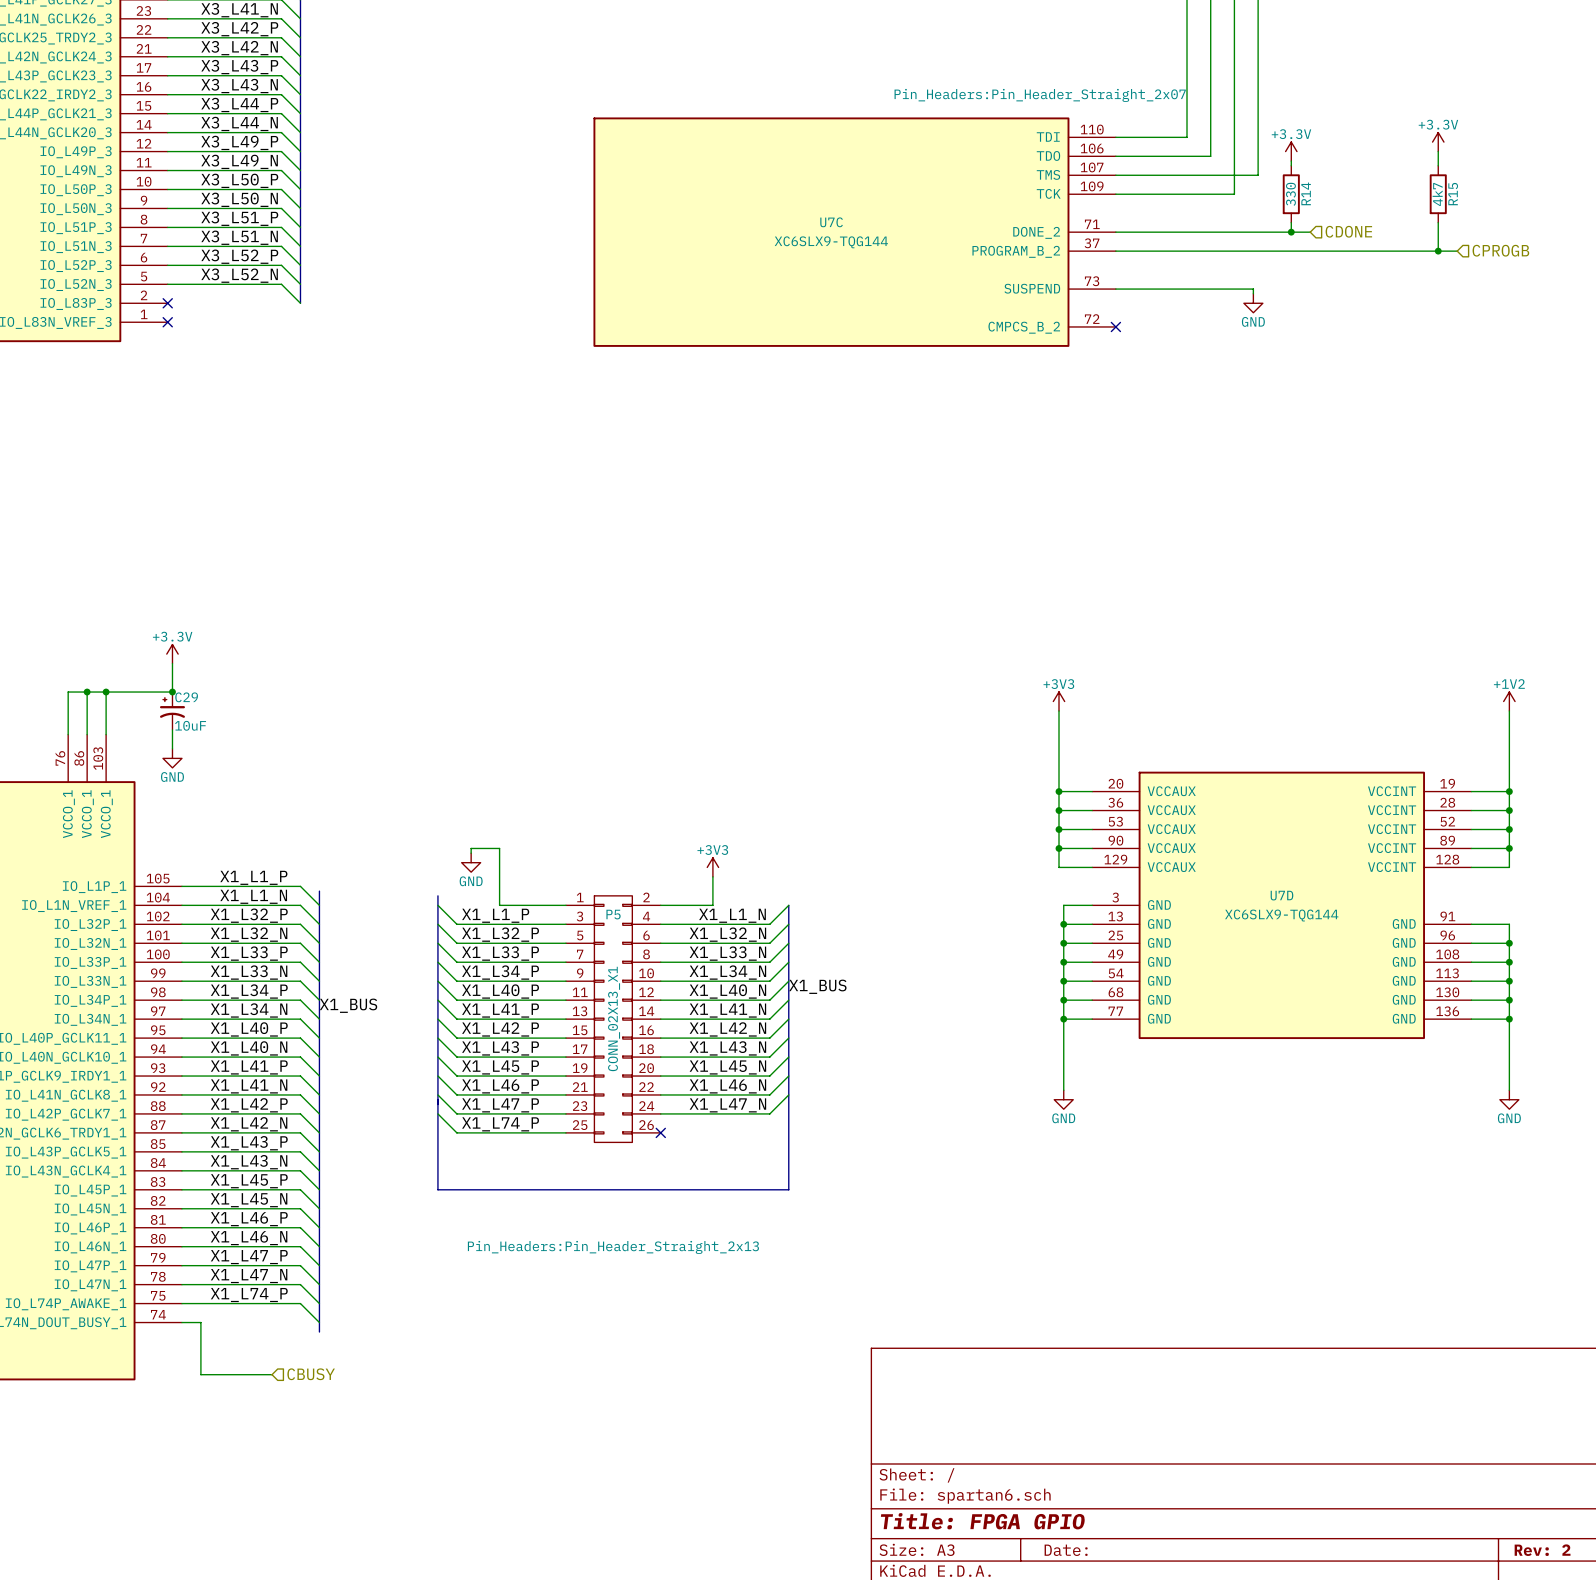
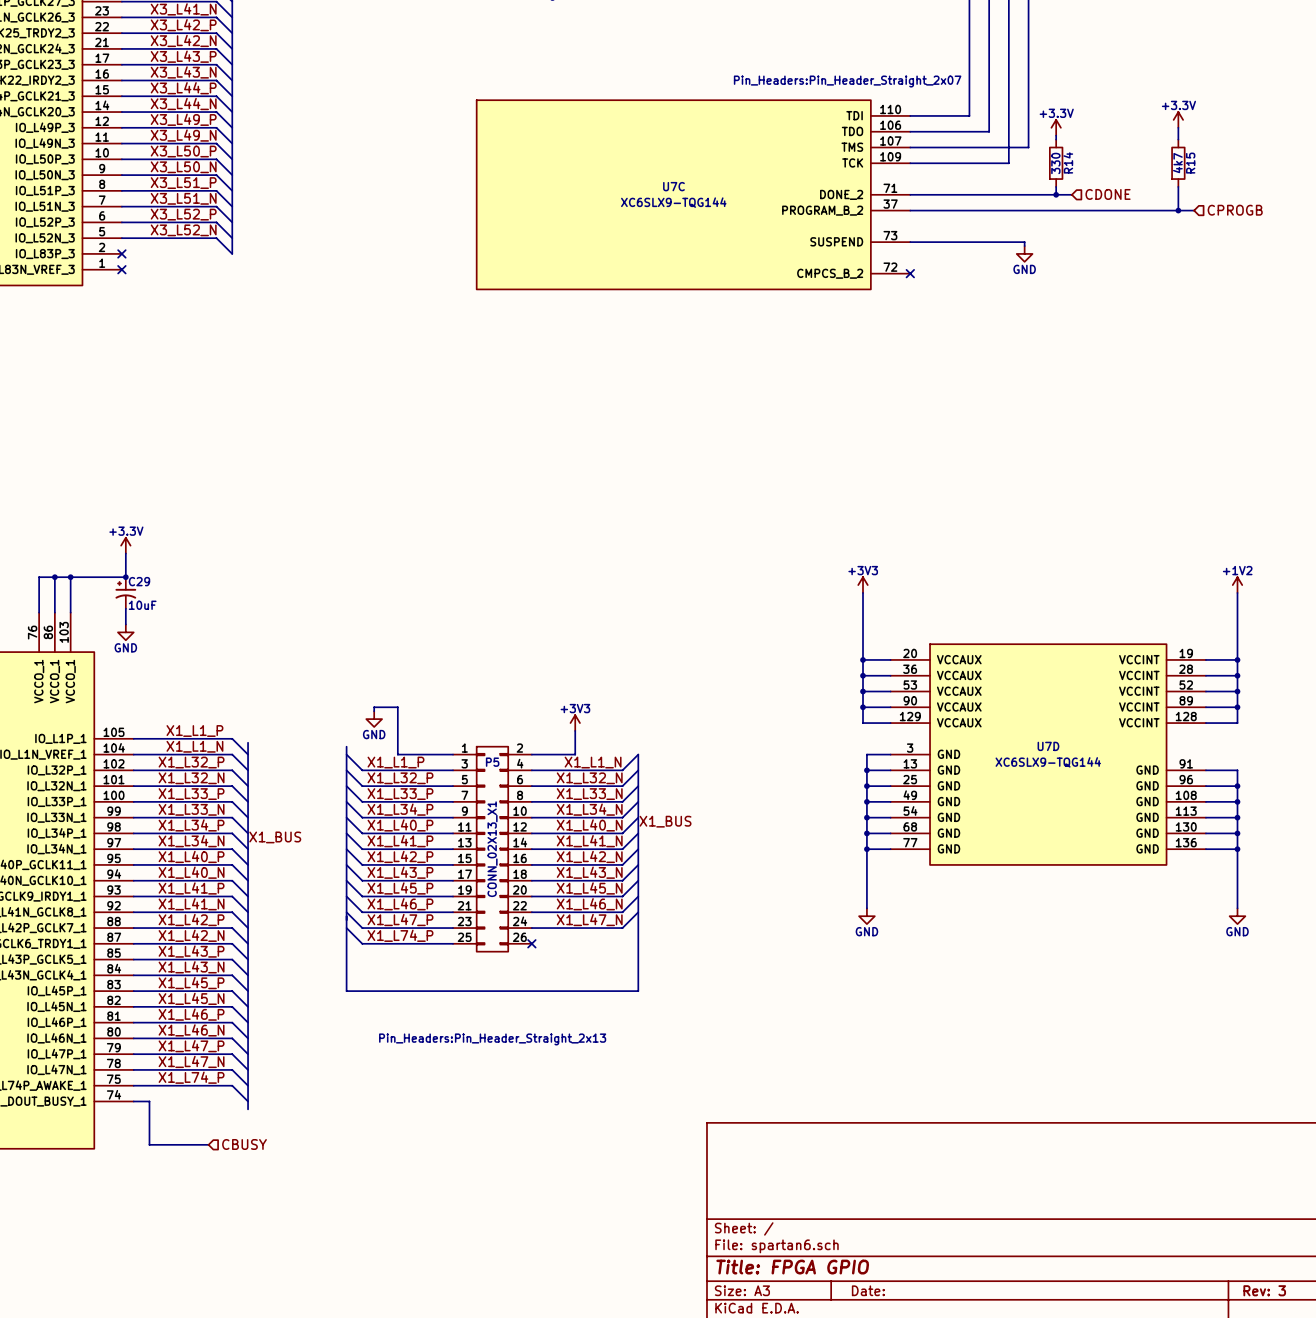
title block: Rev: 2 (1542, 1550) -> Rev: 3 (1264, 1290)

